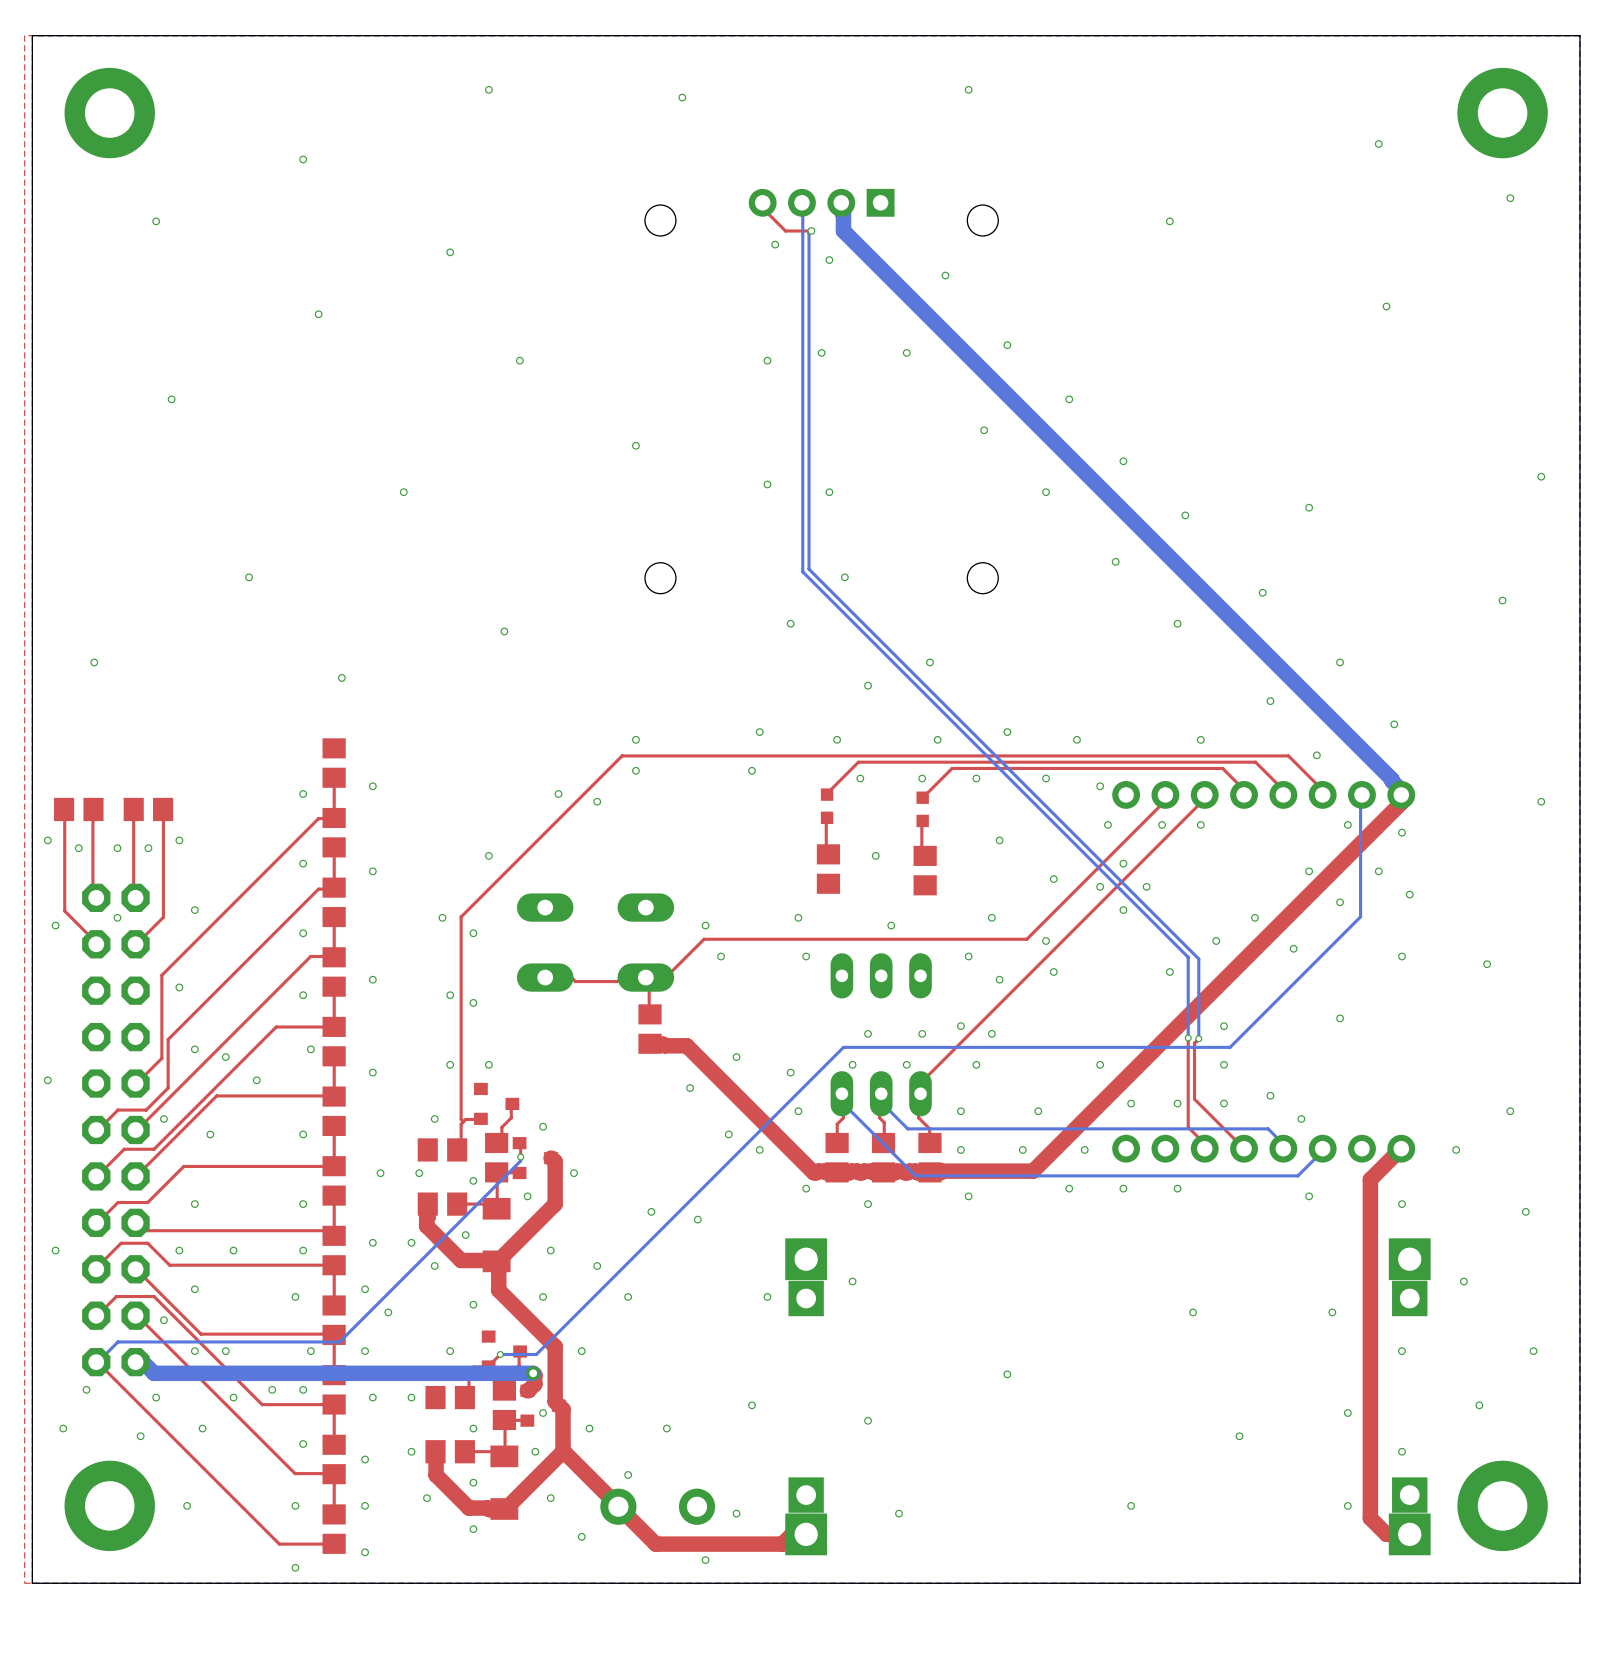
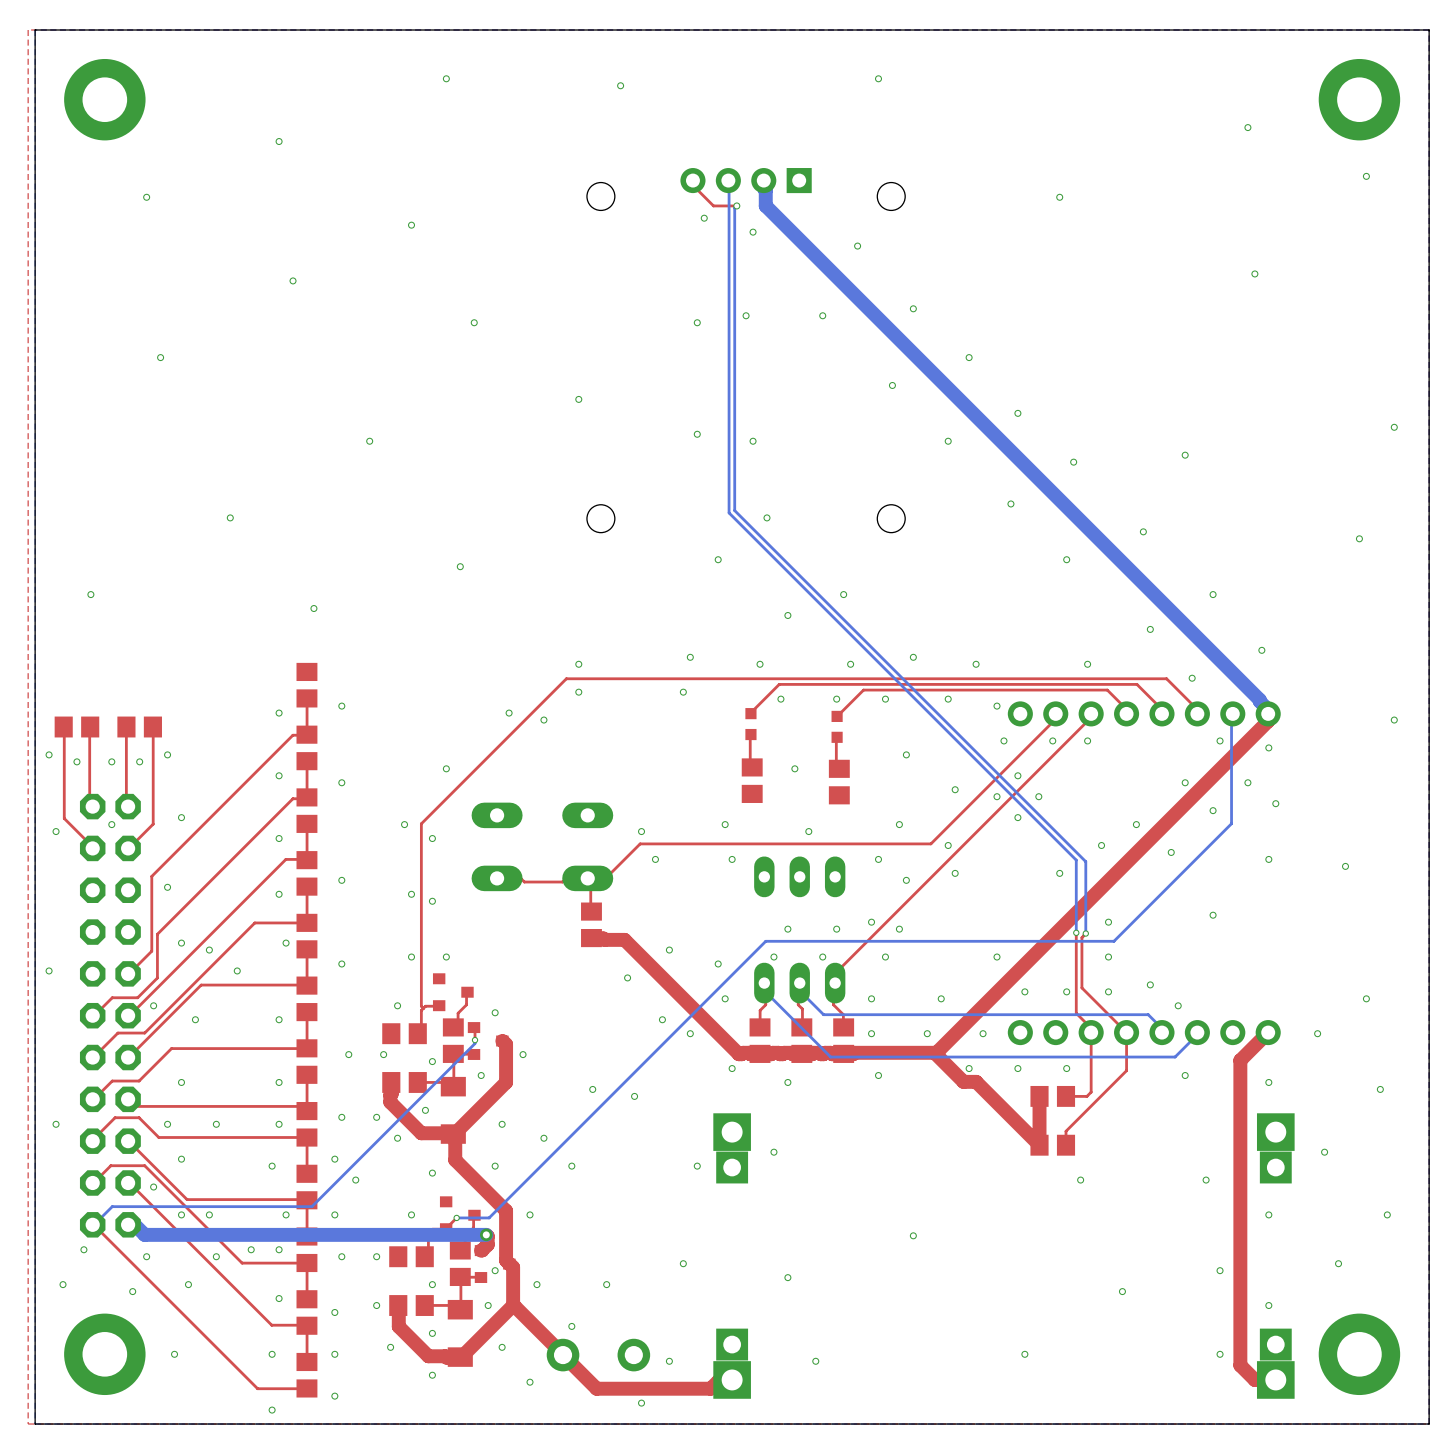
top track: none -> (1091, 1032) (1091, 1092) (1086, 1096) (1066, 1096)
top track: none -> (1126, 1032) (1126, 1070) (1066, 1131) (1066, 1145)
top track: none -> (934, 1052) (963, 1081) (976, 1081) (1039, 1145) (1039, 1096)
part: none -> (1052, 1096)
part: none -> (1052, 1145)

